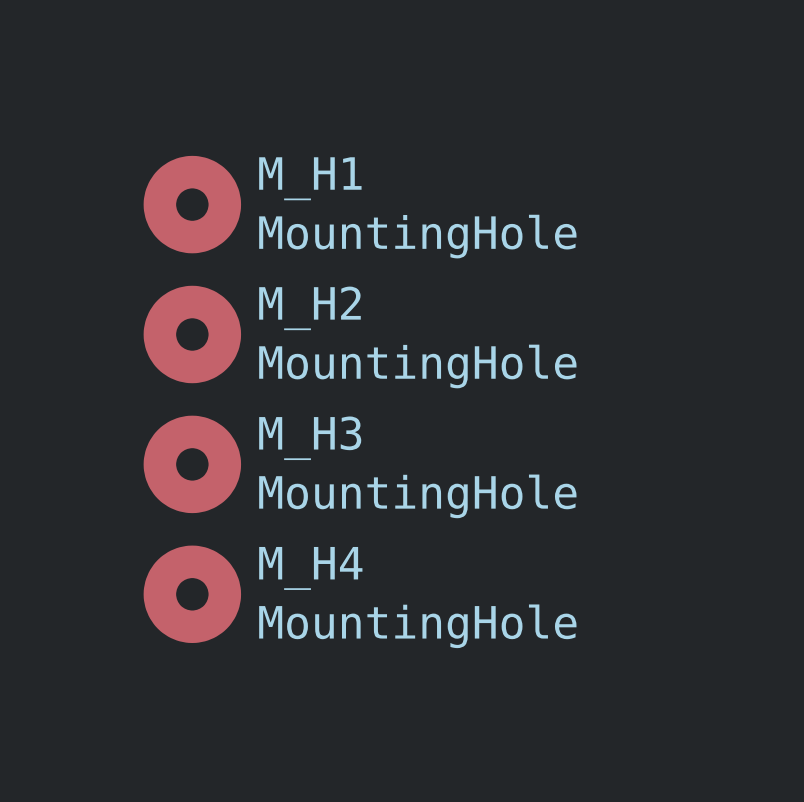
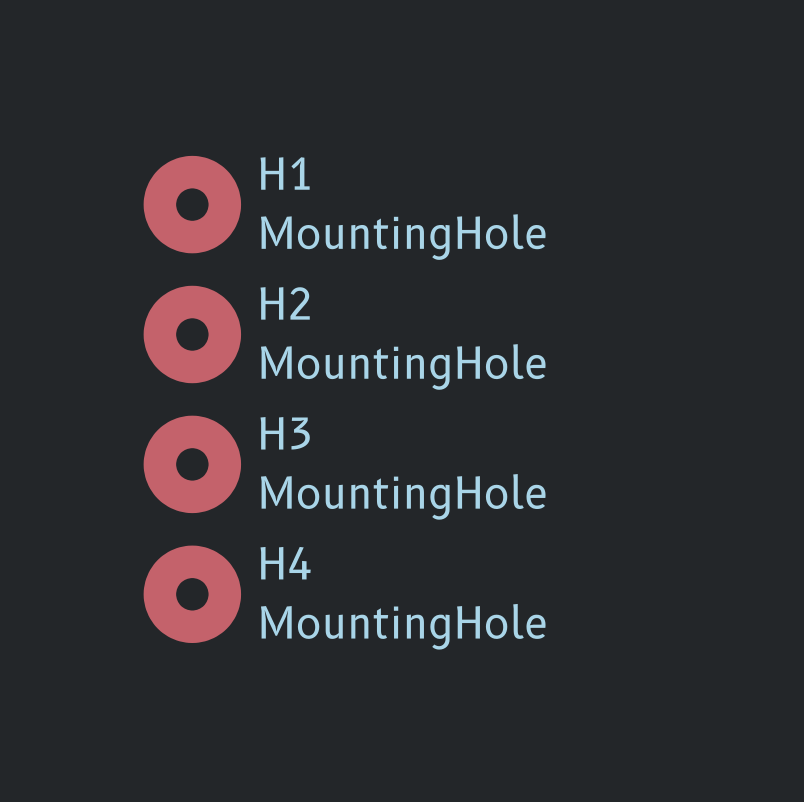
M_H1 name: M_H1 (310, 178) -> H1 (285, 173)
M_H2 name: M_H2 (309, 308) -> H2 (285, 303)
M_H3 name: M_H3 (310, 438) -> H3 (285, 433)
M_H4 name: M_H4 (310, 568) -> H4 (285, 563)

